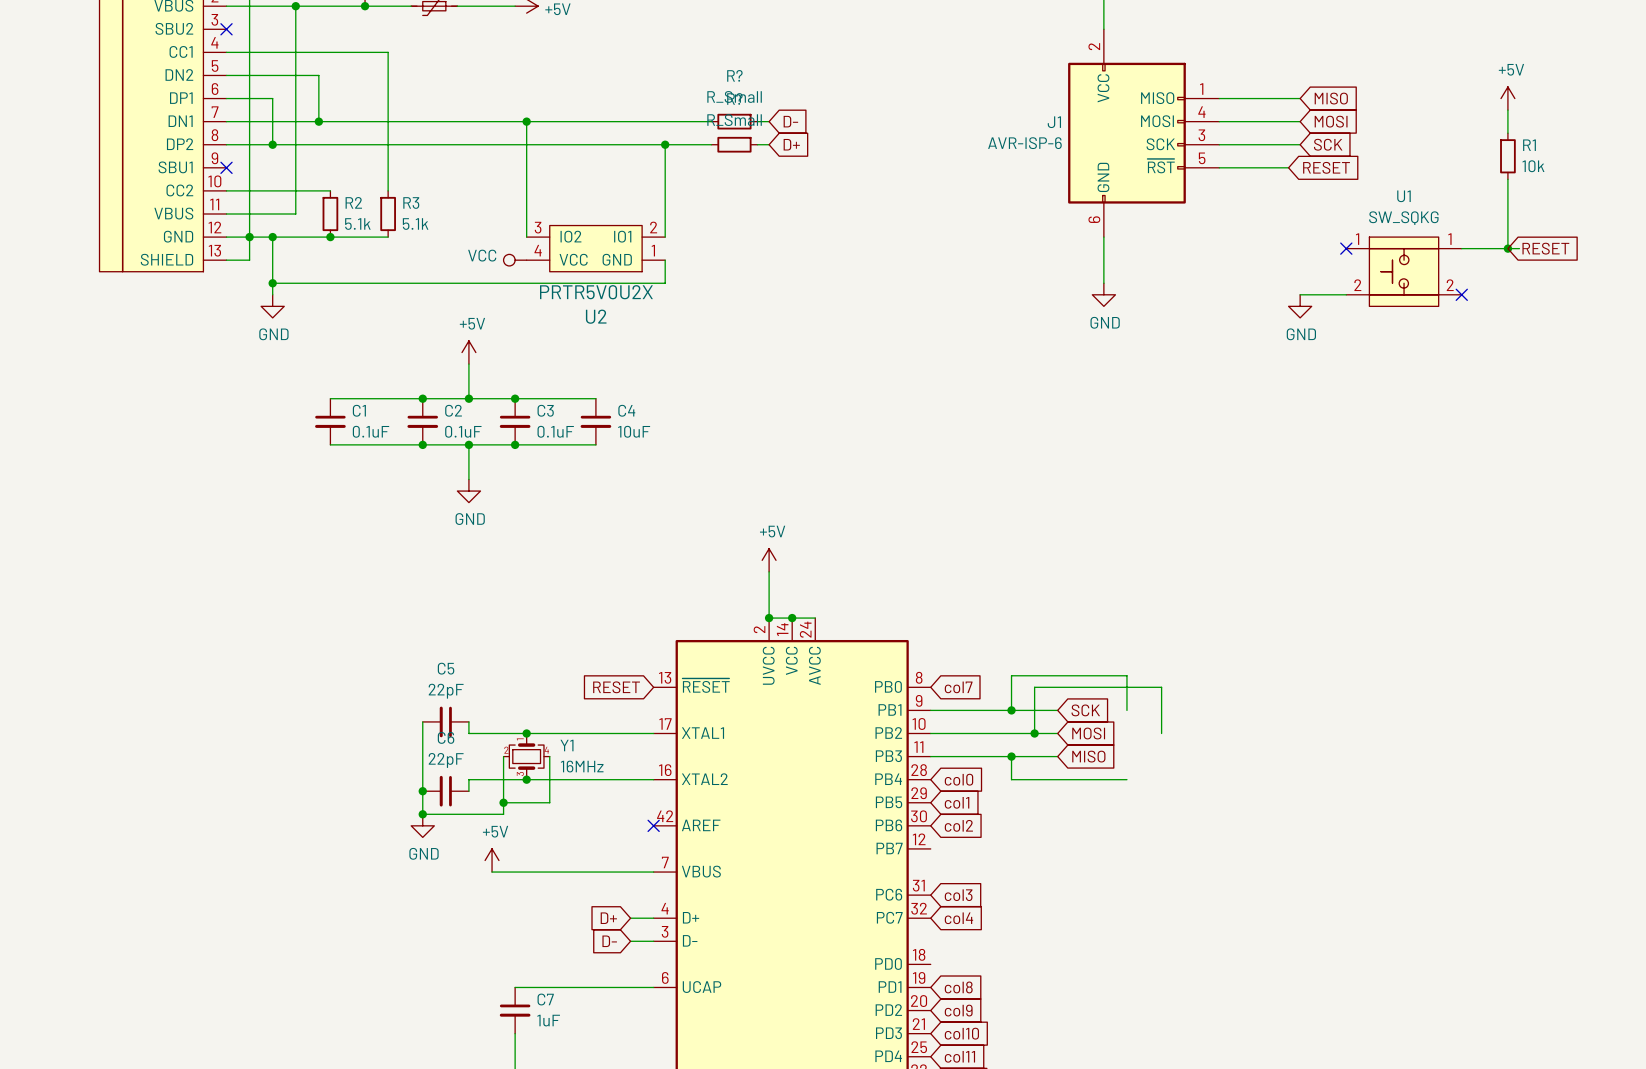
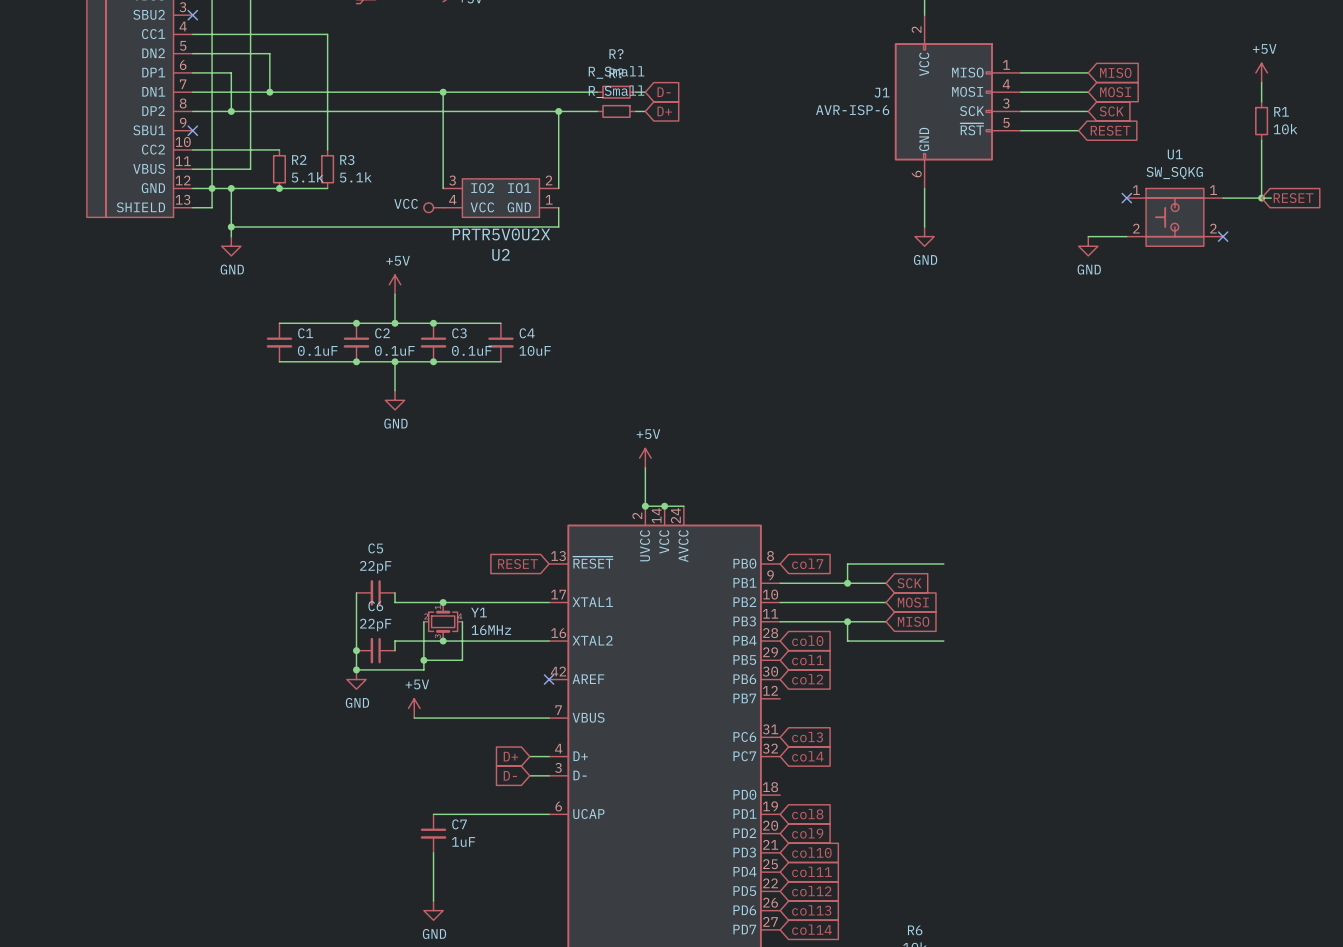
wire: (1011, 687) (1011, 675) (1126, 675) (1126, 710) -> none
wire: (1034, 687) (1034, 733) -> (866, 564) (847, 564)
wire: (1126, 687) (1161, 687) (1161, 733) -> none
junction: (1034, 733) -> none

